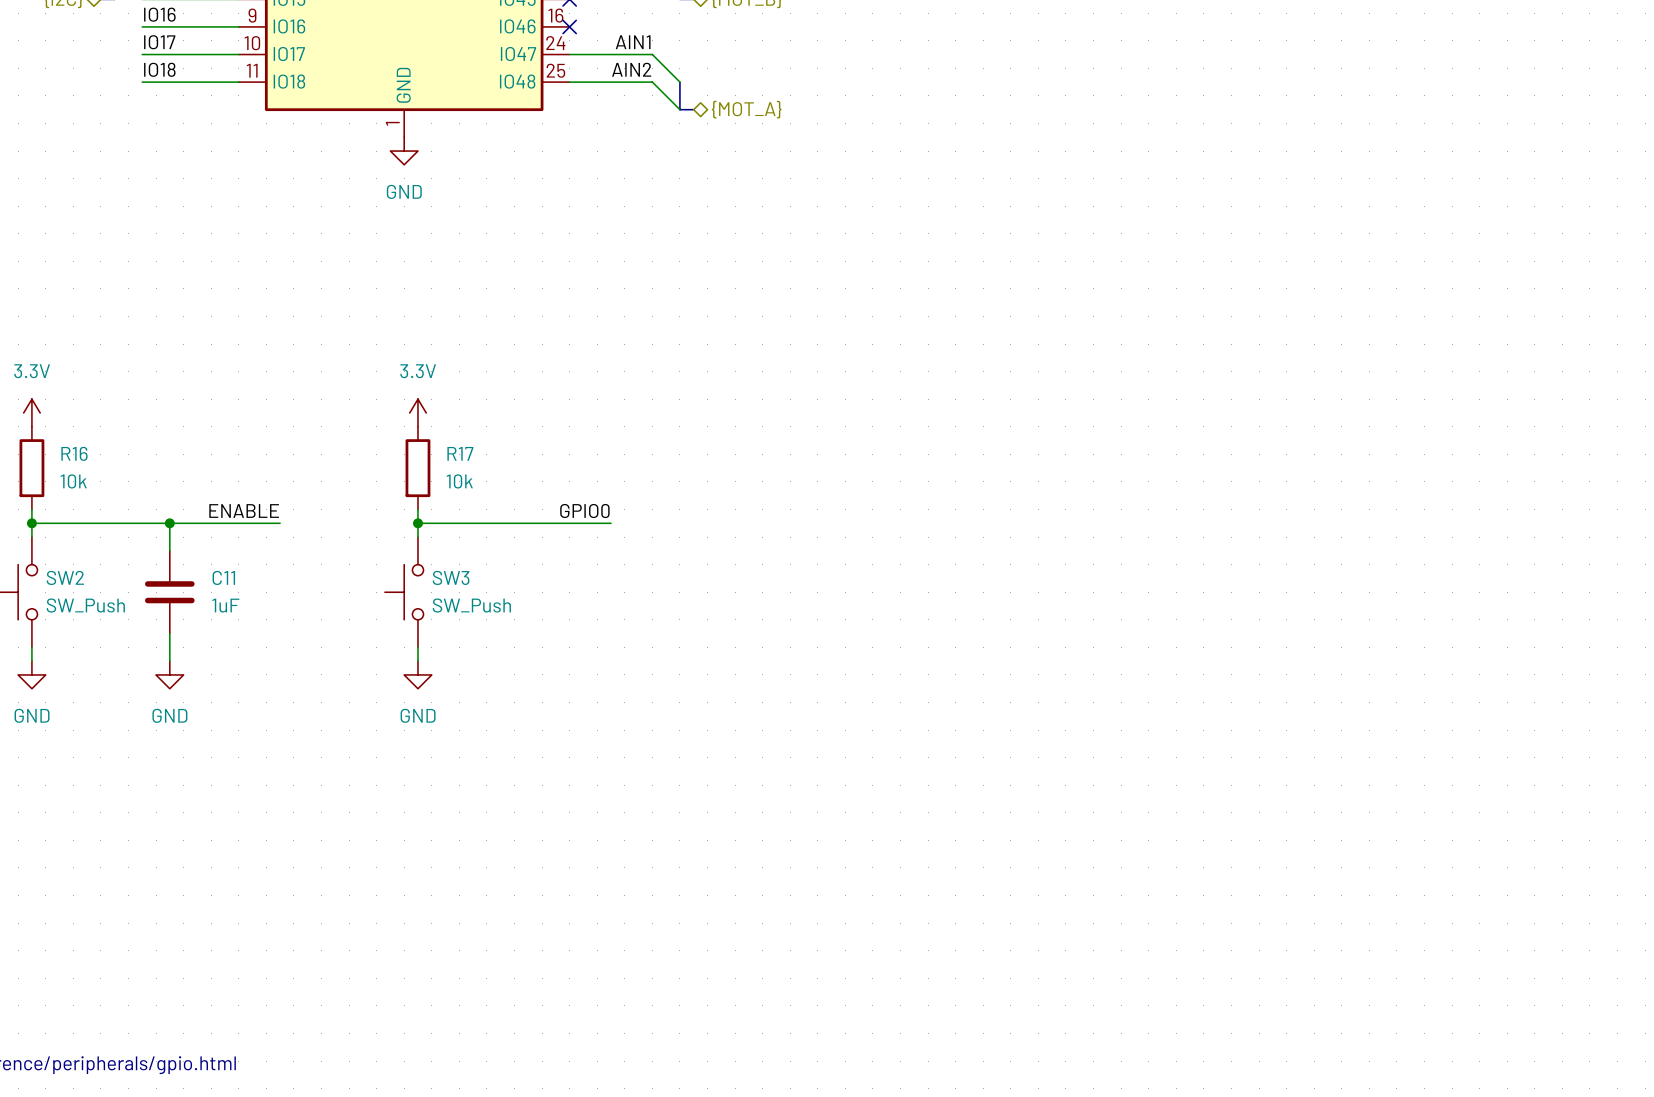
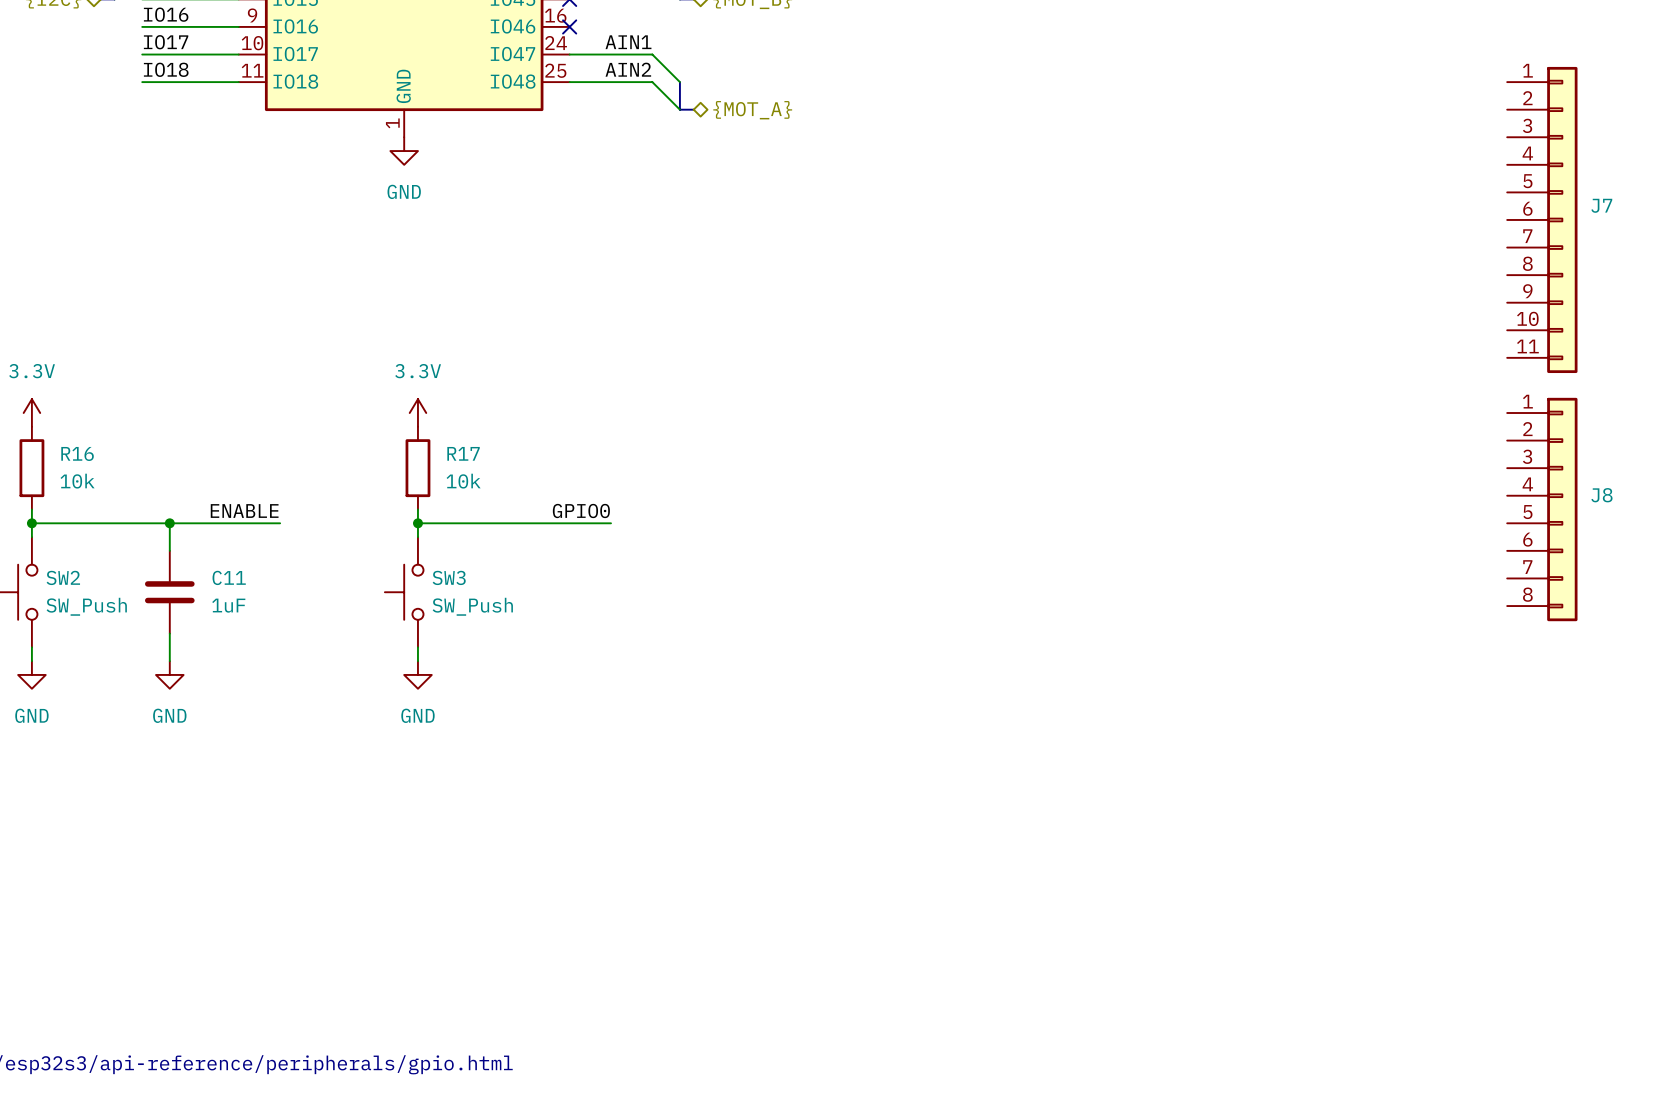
J7: none -> (1542, 219)
J8: none -> (1542, 509)

